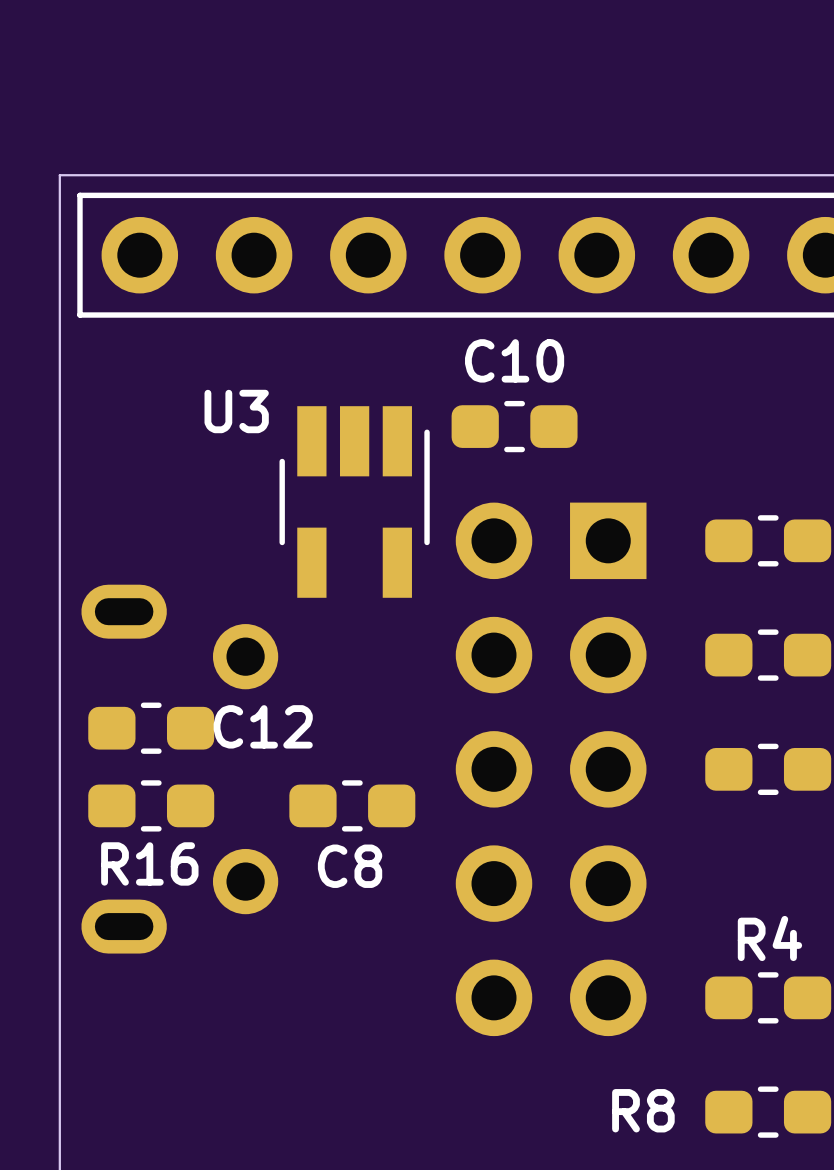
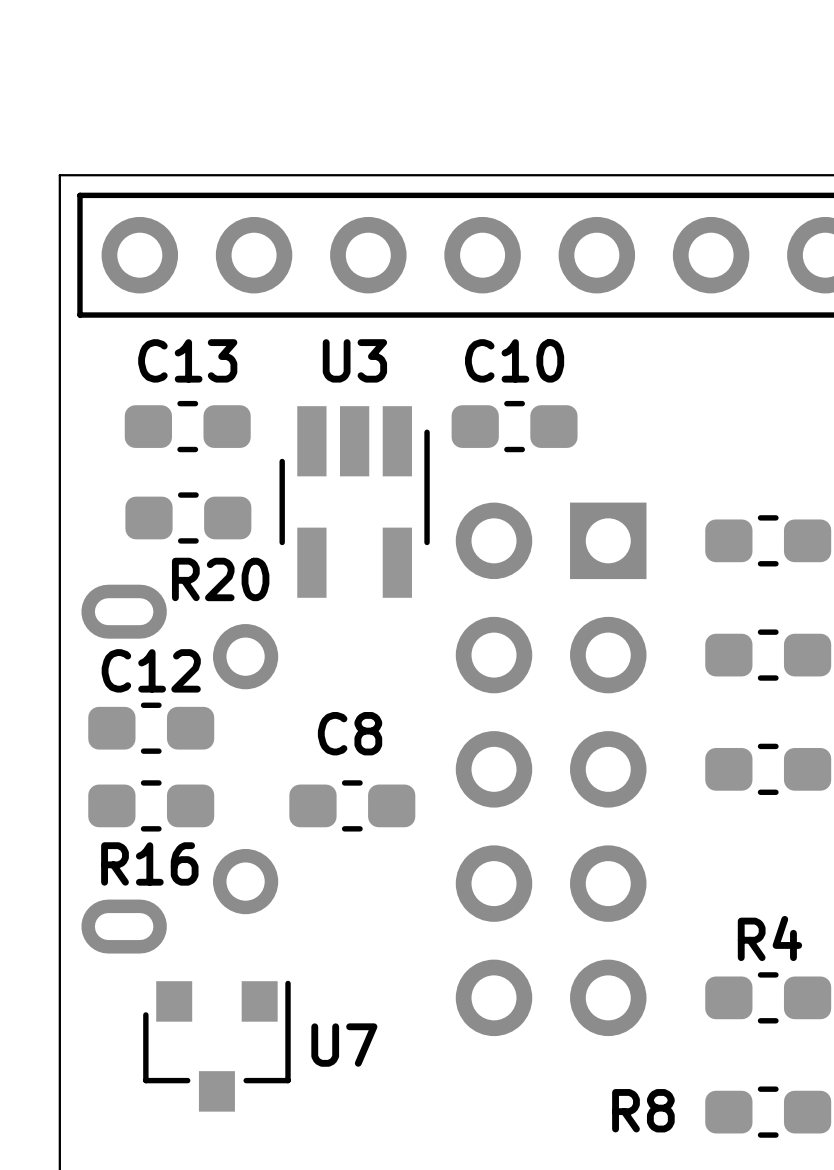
U3 name position: U3 (236, 411) -> U3 (354, 360)
C13: none -> (187, 426)
R20: none -> (188, 517)
C12 name position: C12 (263, 726) -> C12 (151, 670)
C8 name position: C8 (350, 866) -> C8 (350, 733)
U7: none -> (216, 1046)

